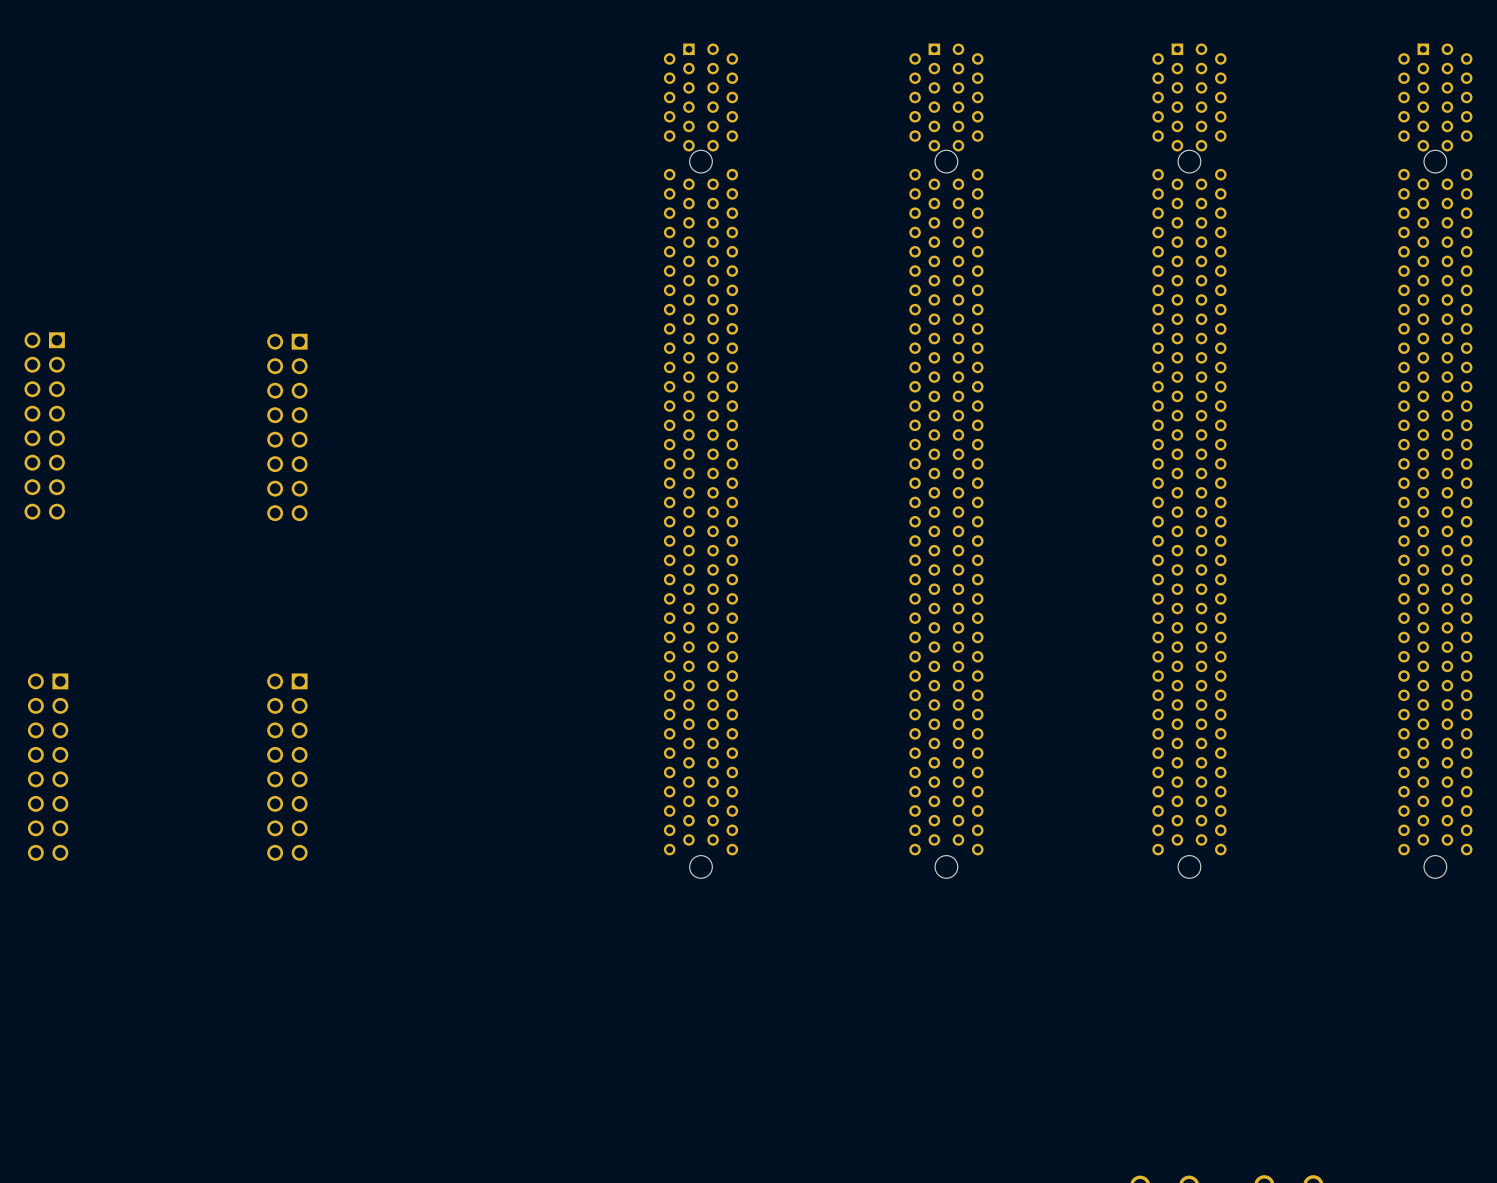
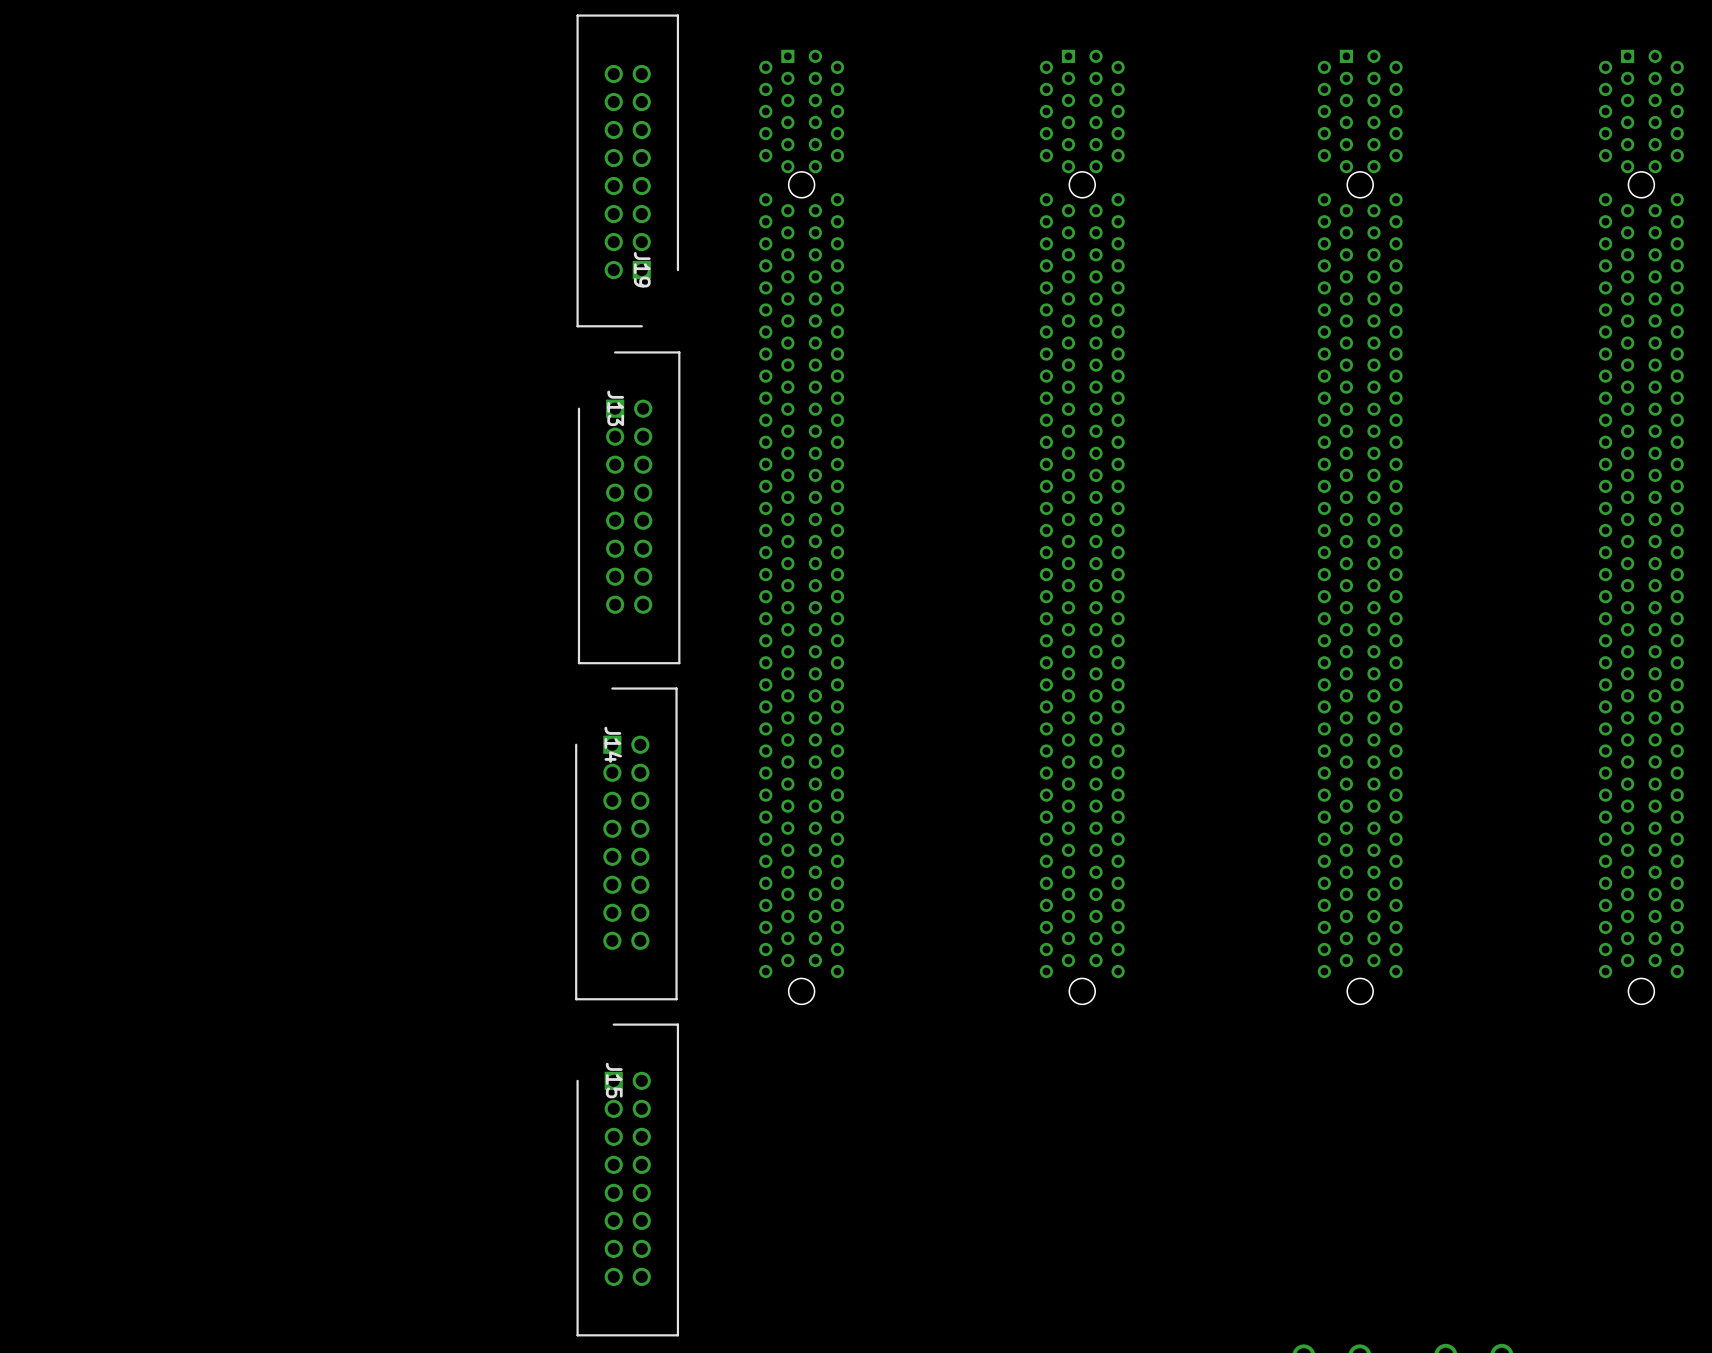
J19: none -> (627, 170)
part: (44, 425) -> none
part: (287, 427) -> none
J13: none -> (629, 507)
J14: none -> (626, 843)
part: (48, 767) -> none
part: (287, 767) -> none
J15: none -> (627, 1179)

